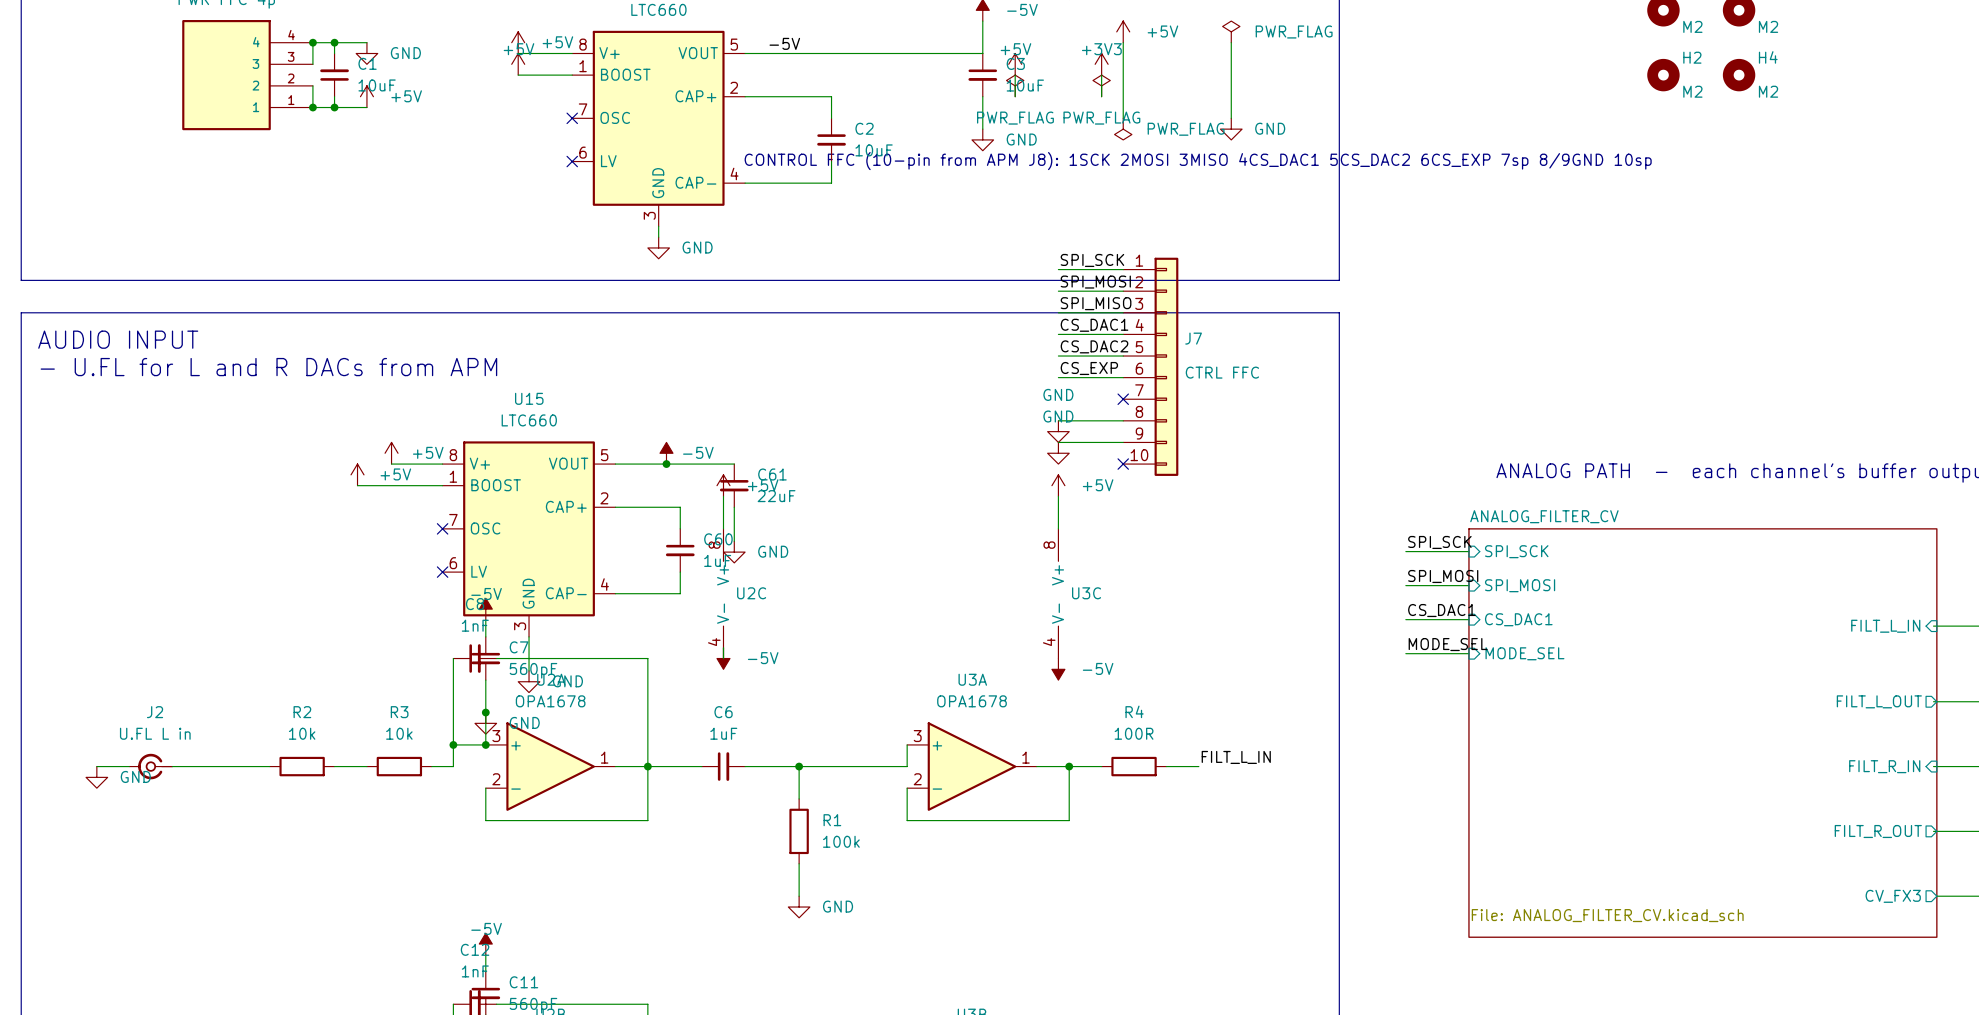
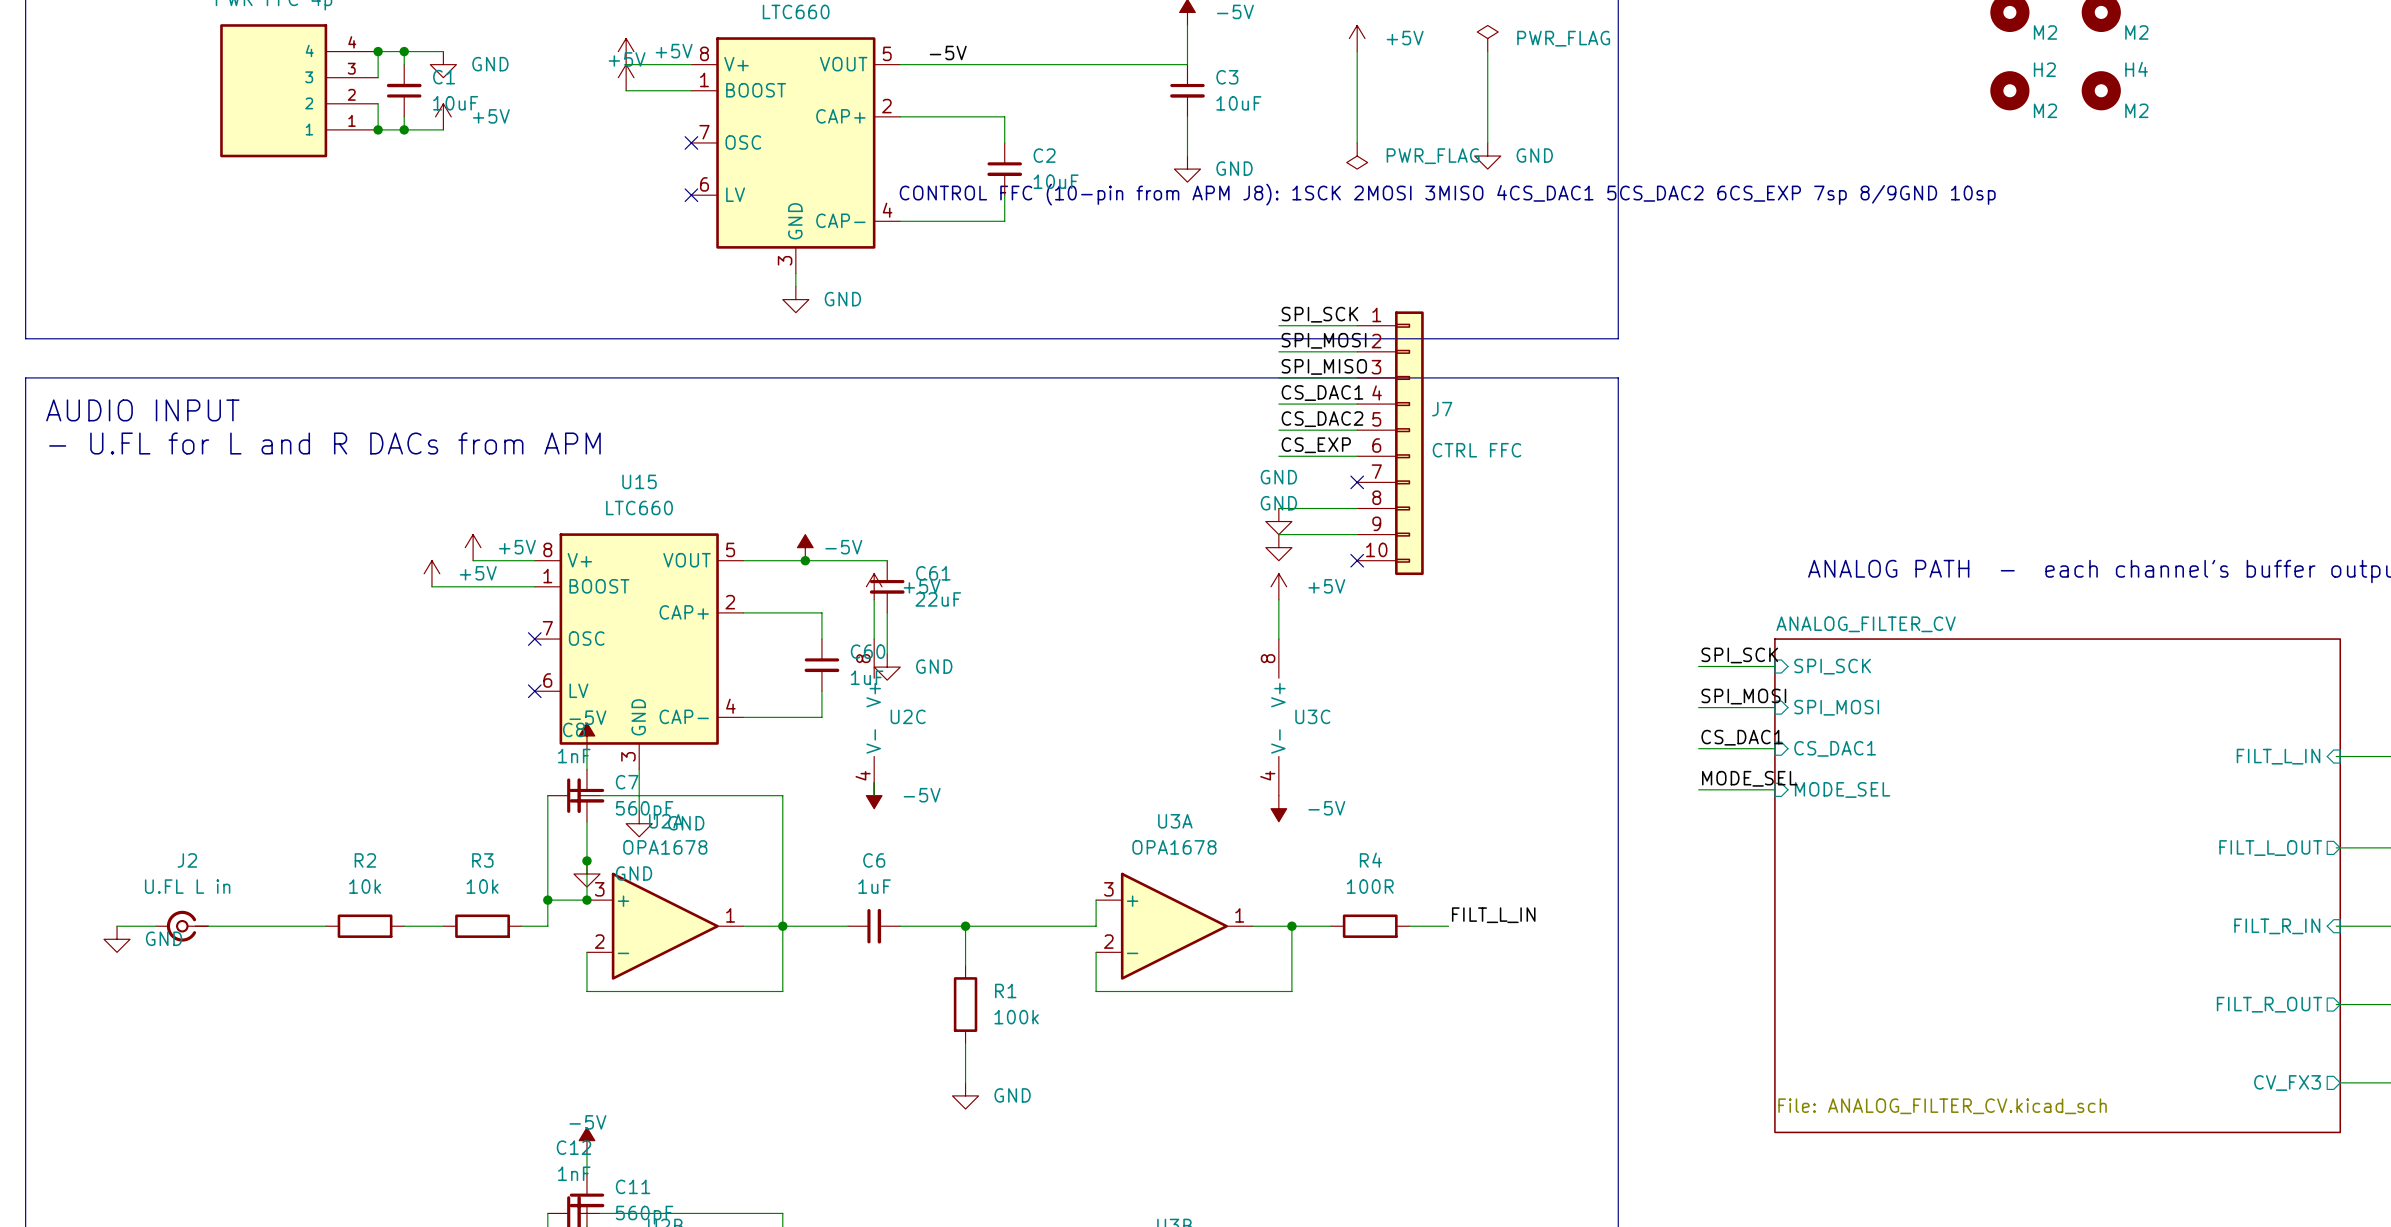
power symbol: +5V (1015, 64) -> none
power symbol: +3V3 (1101, 64) -> none
wire: (1015, 75) (1015, 96) -> none
wire: (1101, 75) (1101, 96) -> none
power symbol: PWR_FLAG (1015, 85) -> none
power symbol: PWR_FLAG (1101, 85) -> none

